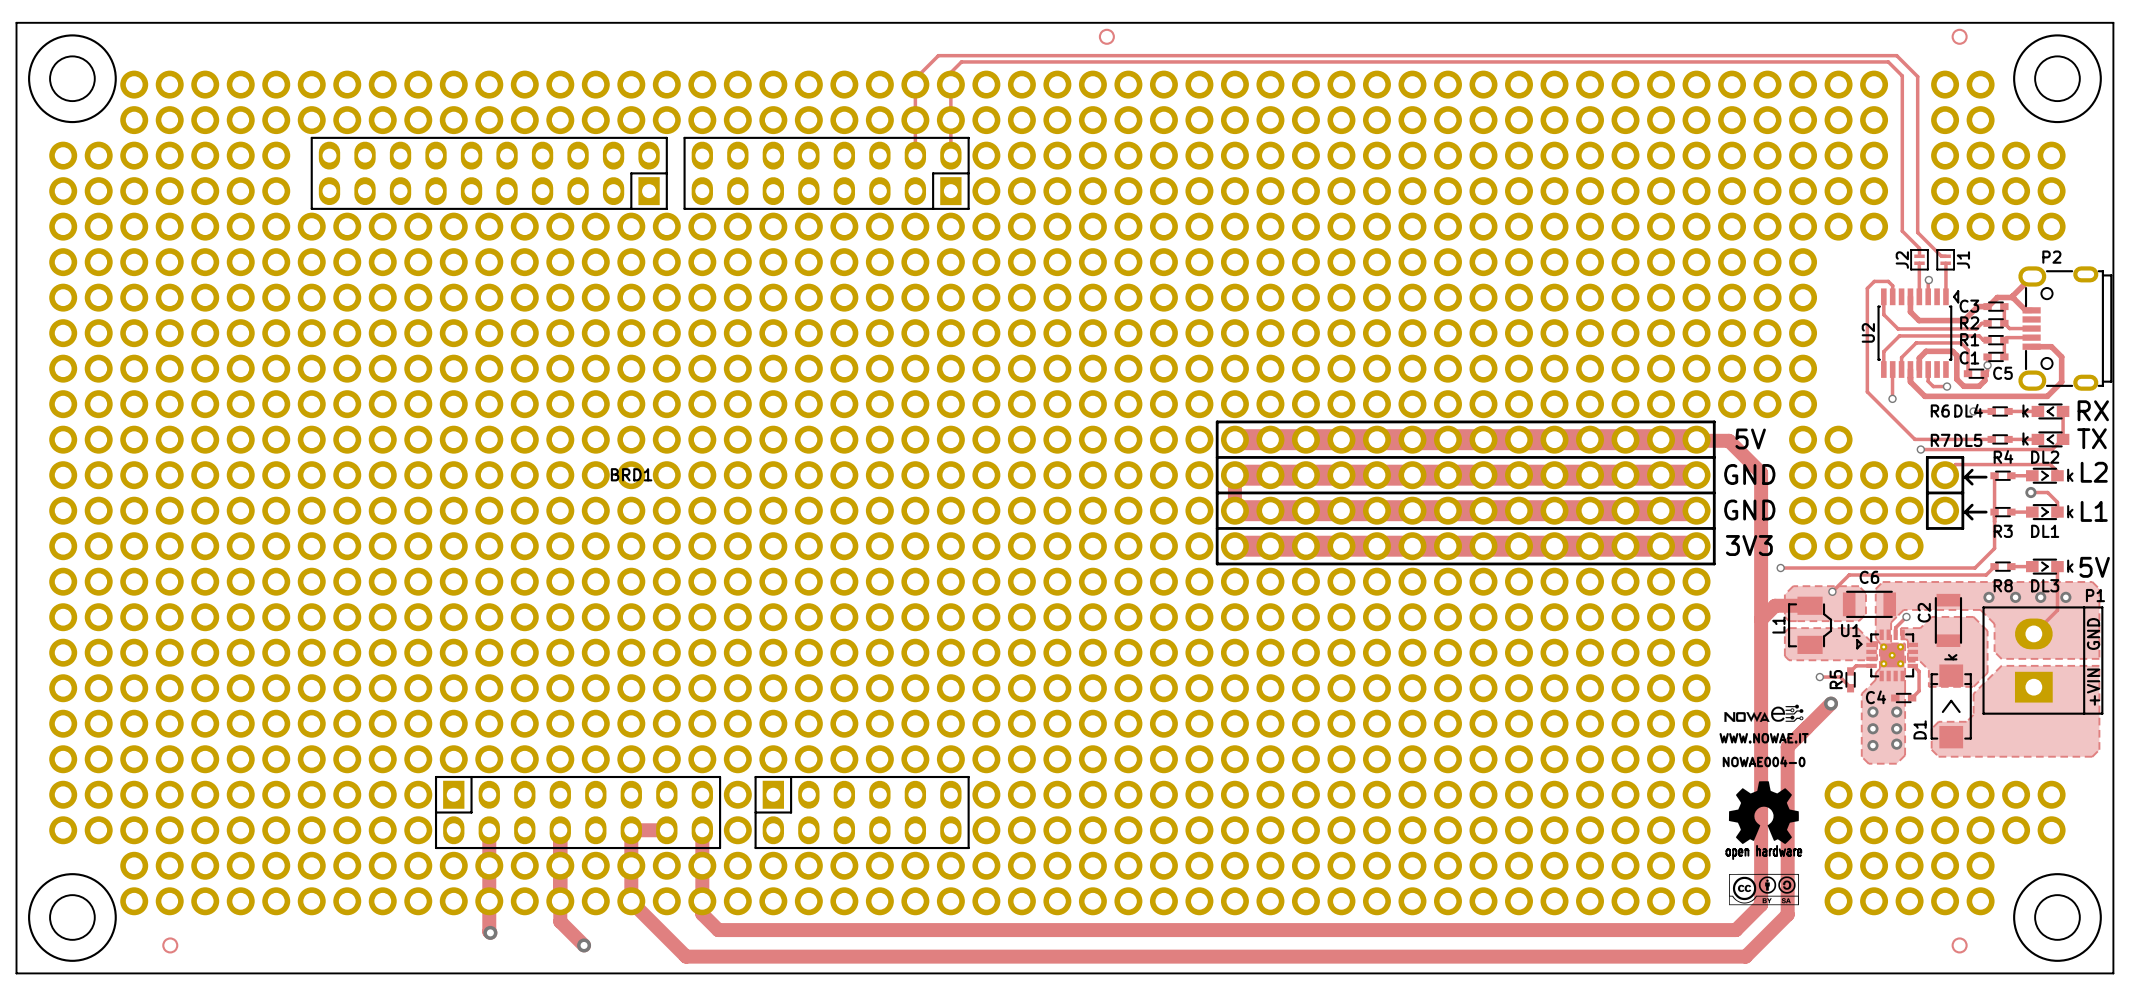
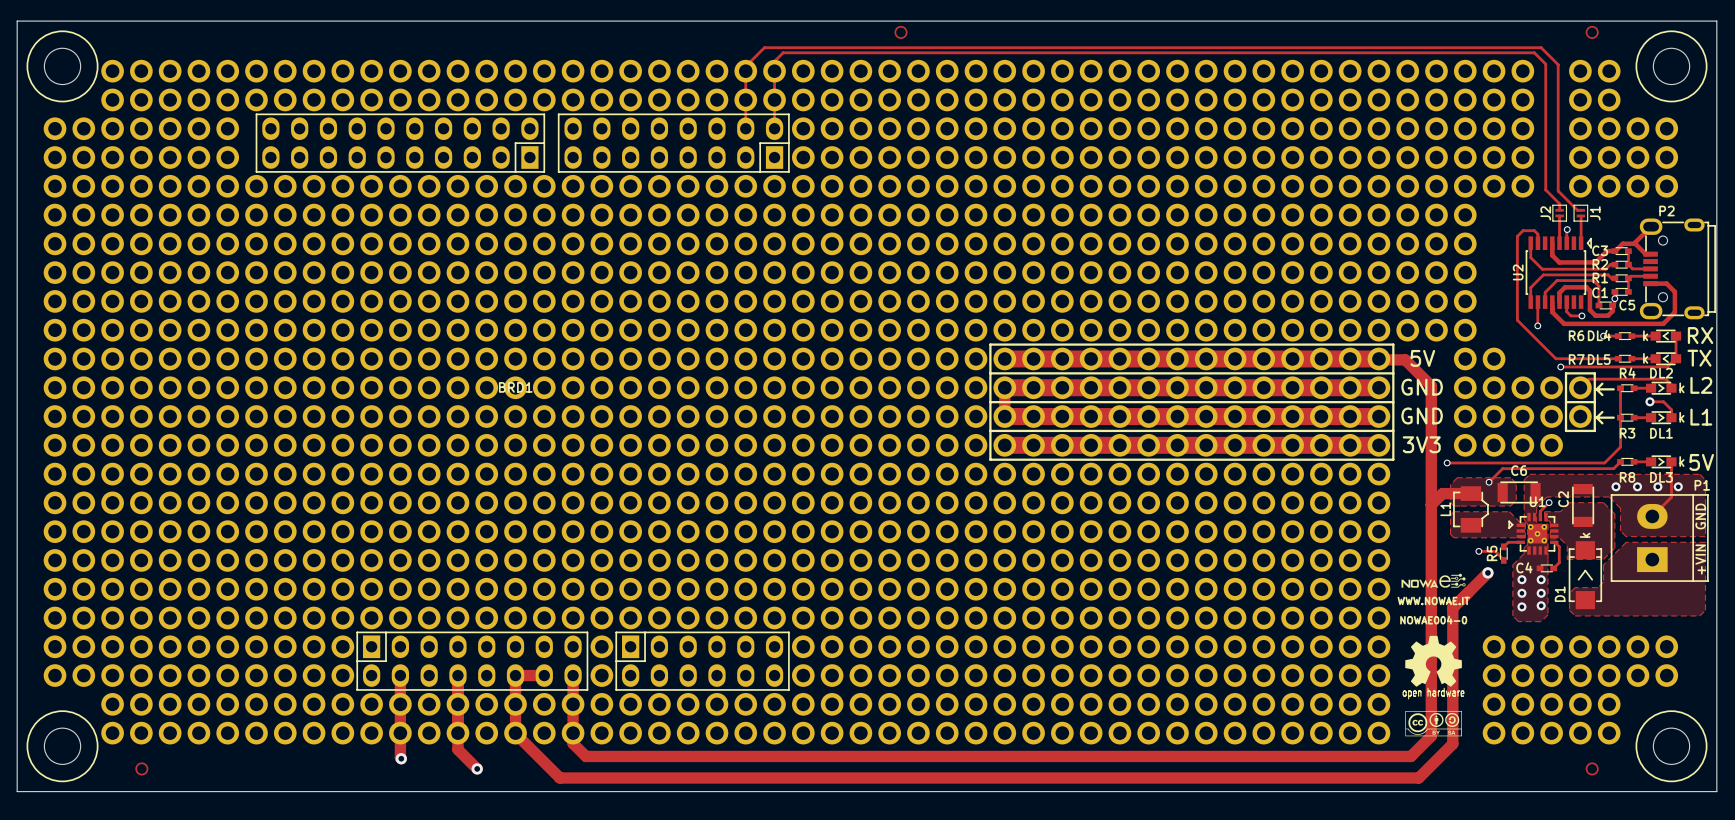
U1 name position: U1 (1850, 630) -> U1 (1537, 501)

